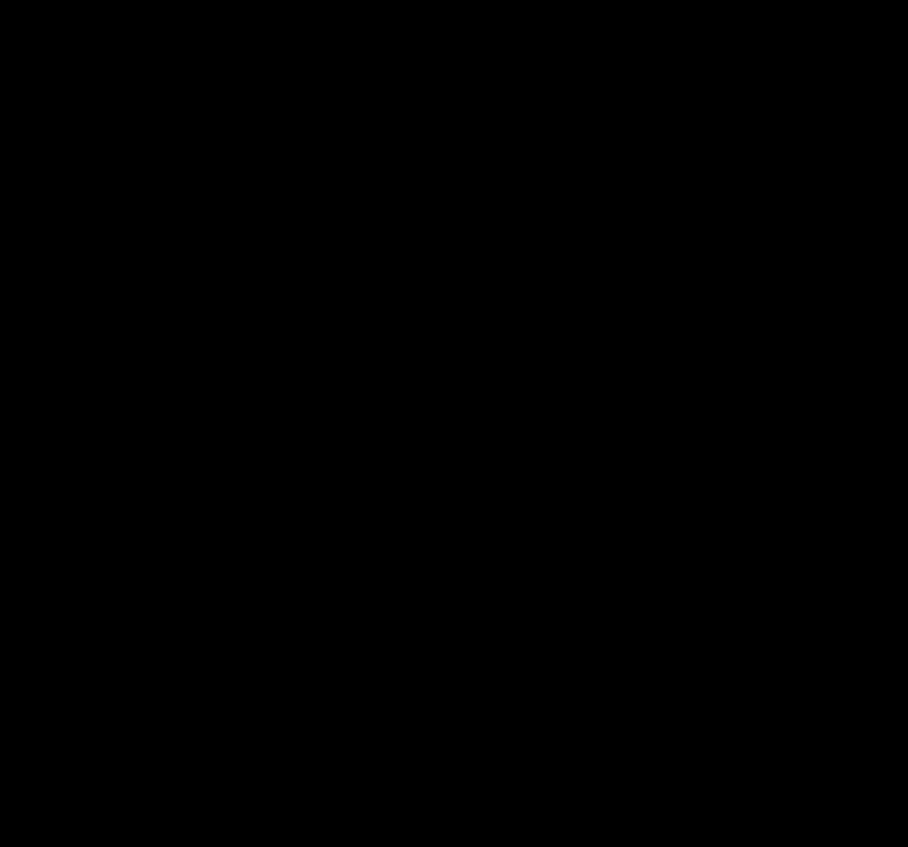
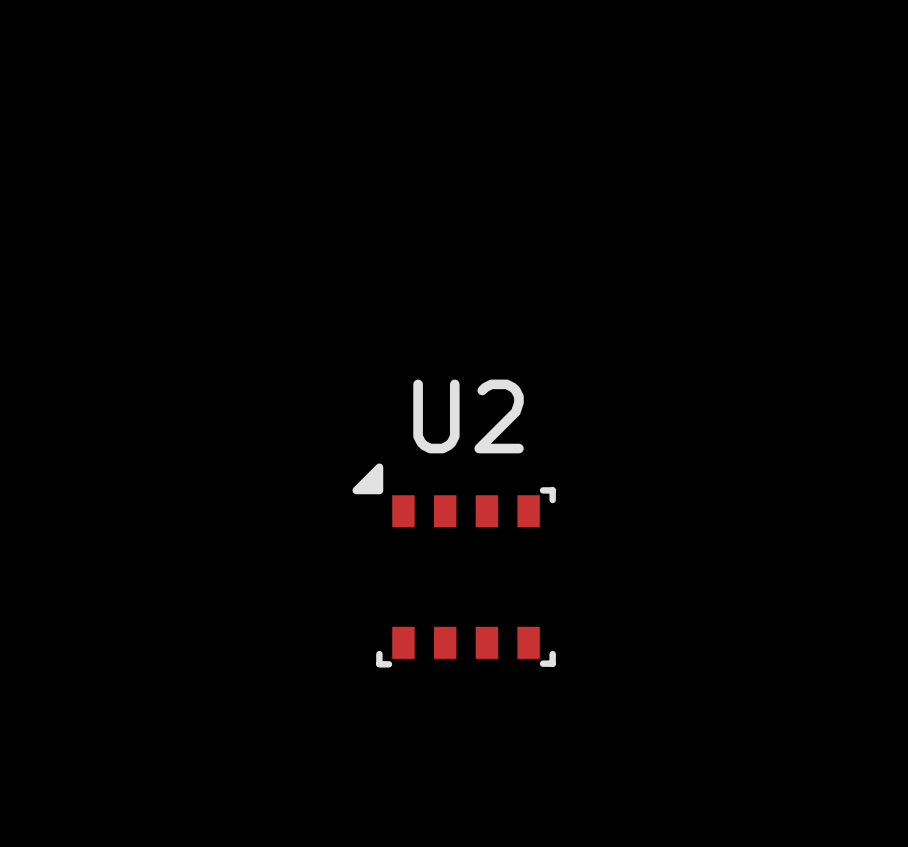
U2: none -> (454, 565)

